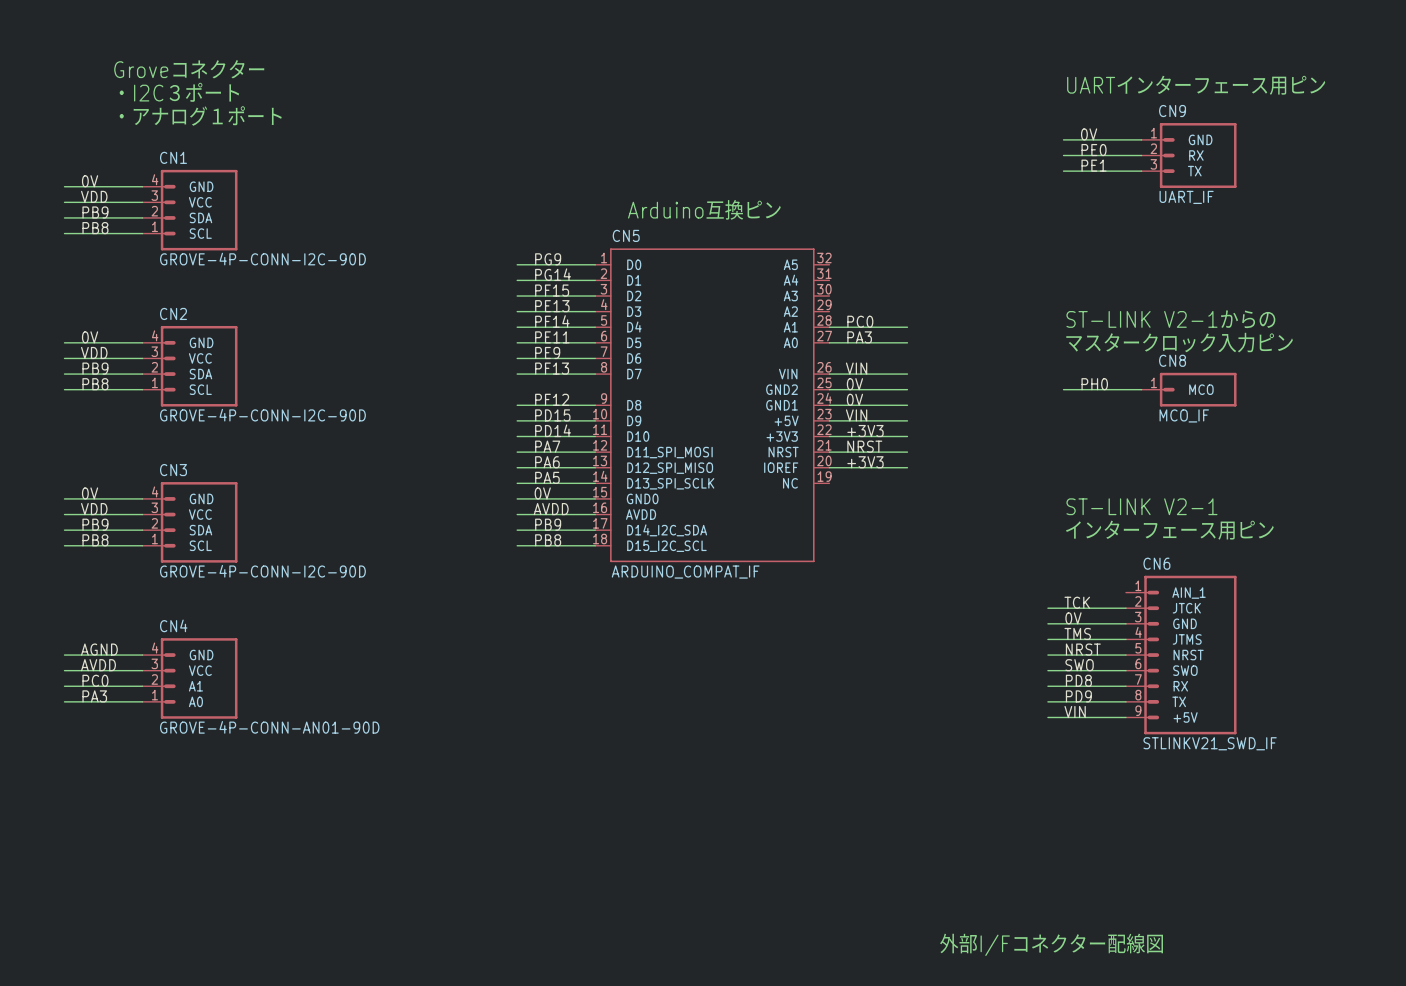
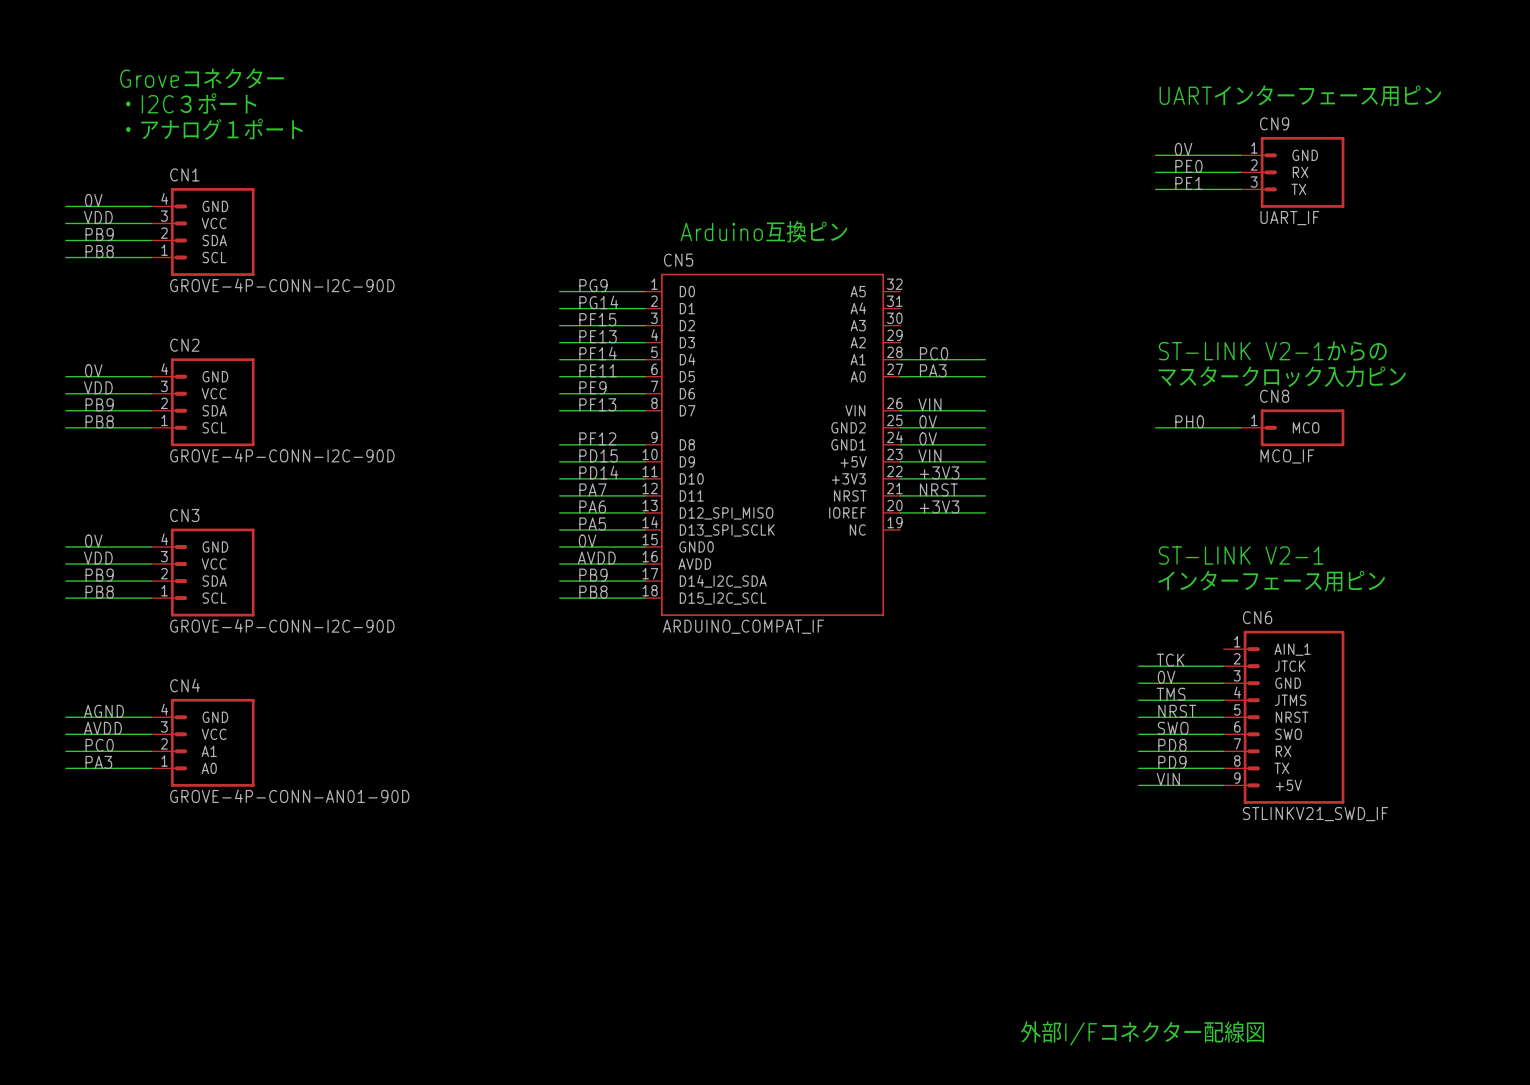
CN5 pin name: D11_SPI_MOSI (669, 452) -> D11 (691, 495)

